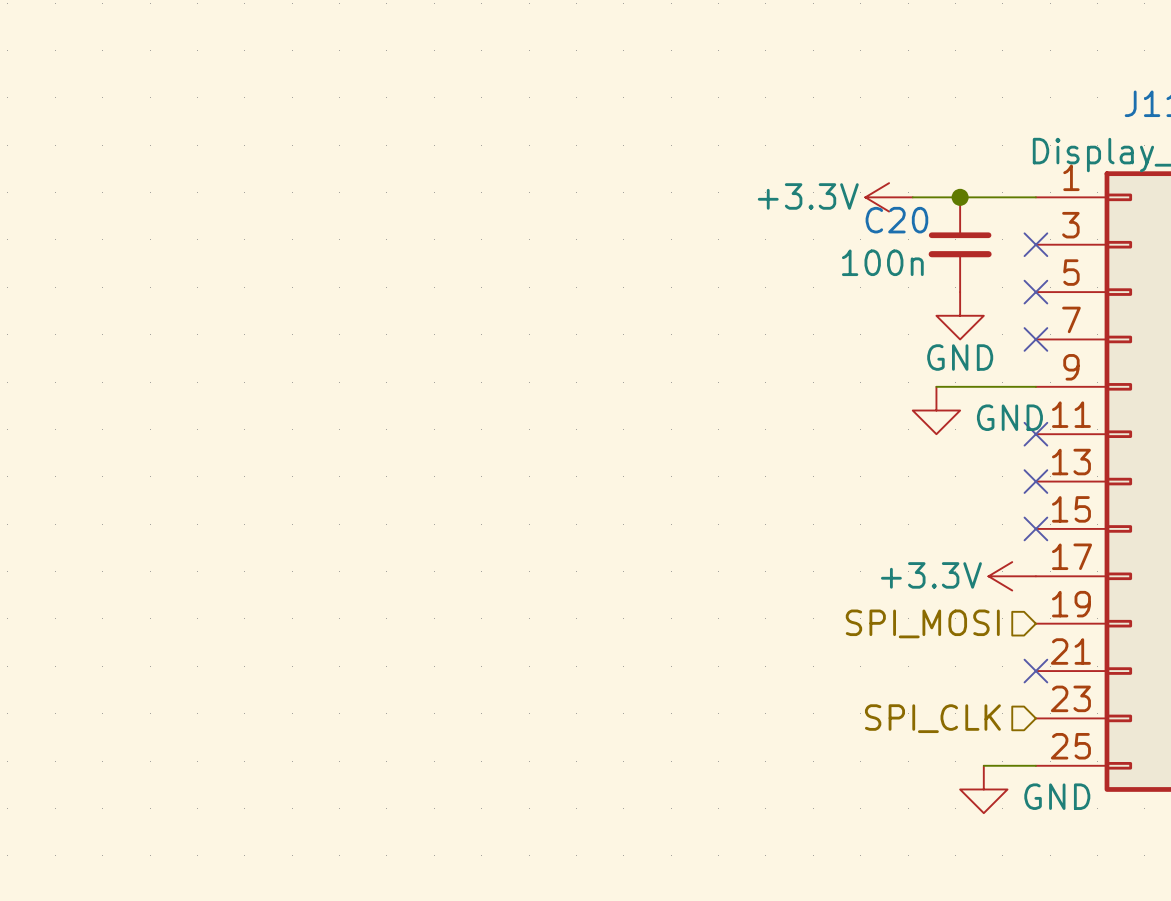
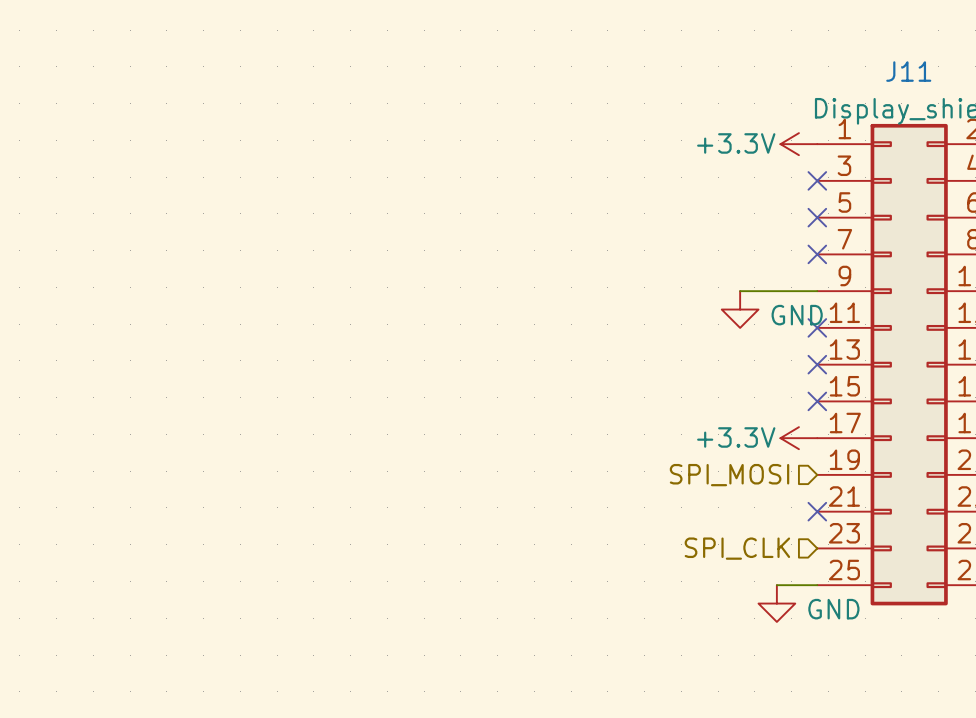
power symbol position: +3.3V (889, 197) -> +3.3V (798, 144)
wire: (912, 197) (1035, 197) -> none
junction: (960, 197) -> none
C20: 100n (960, 244) -> none
power symbol: GND (960, 315) -> none

